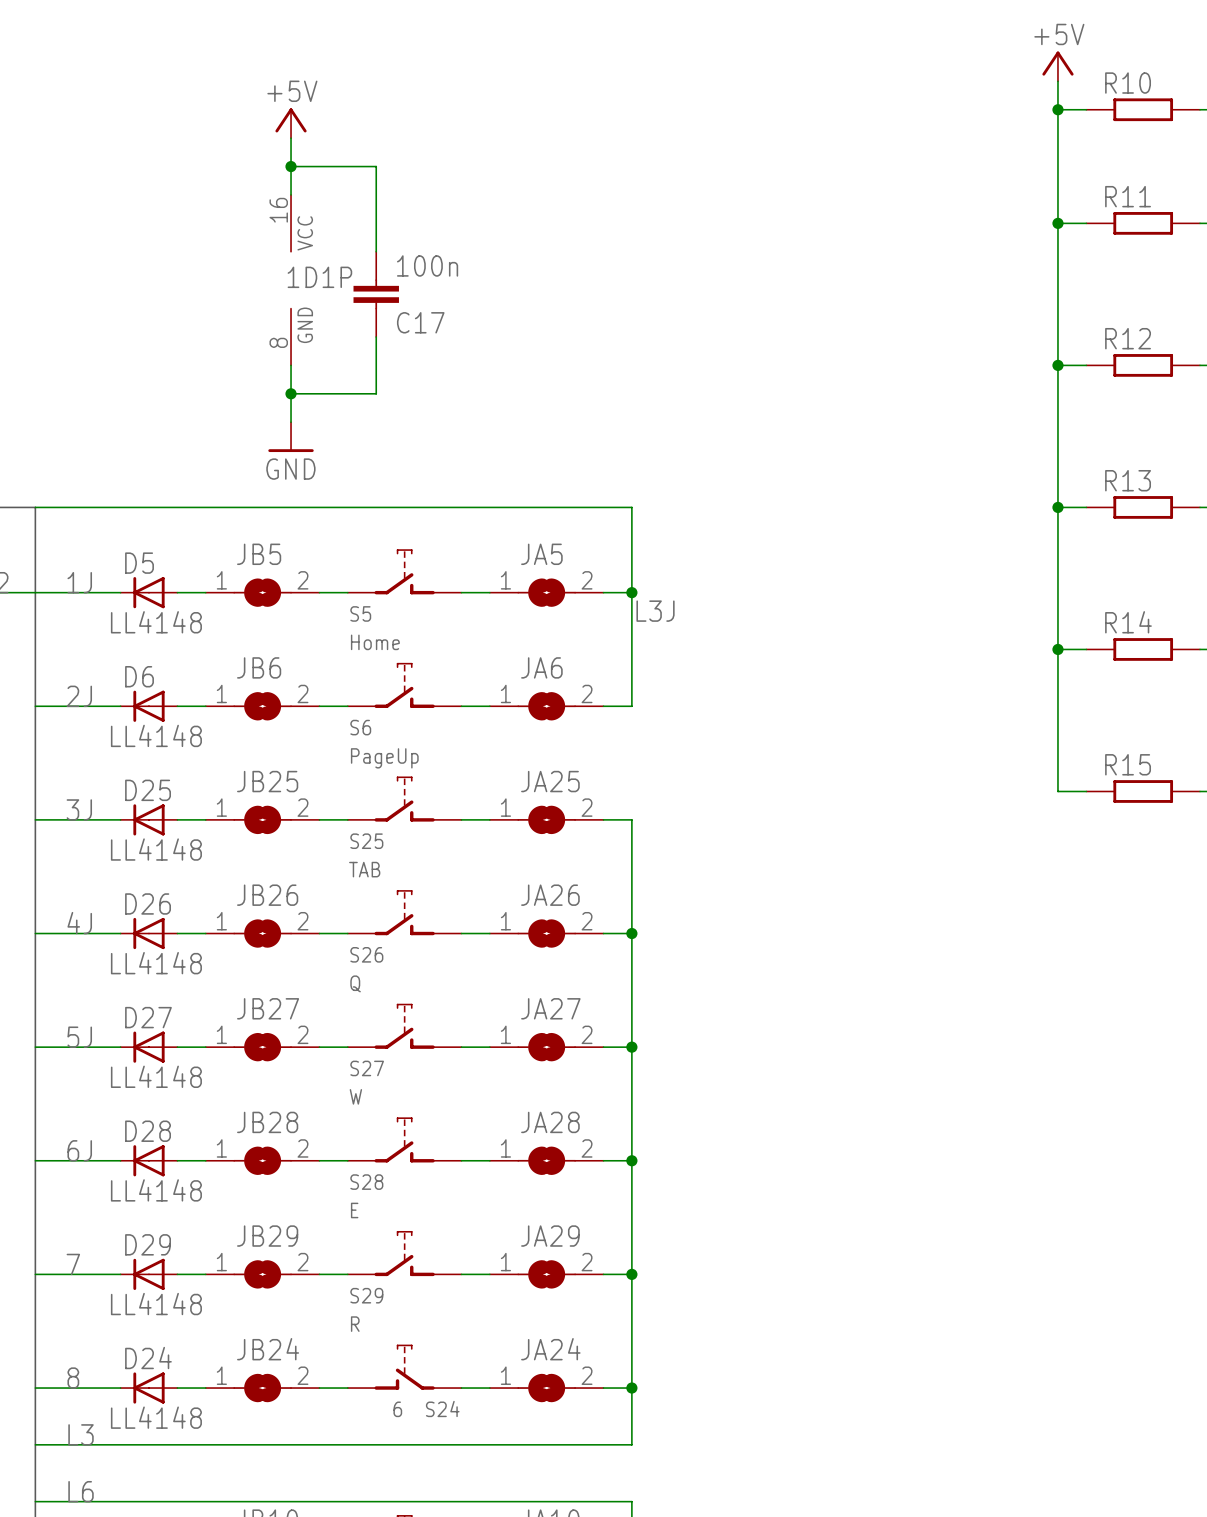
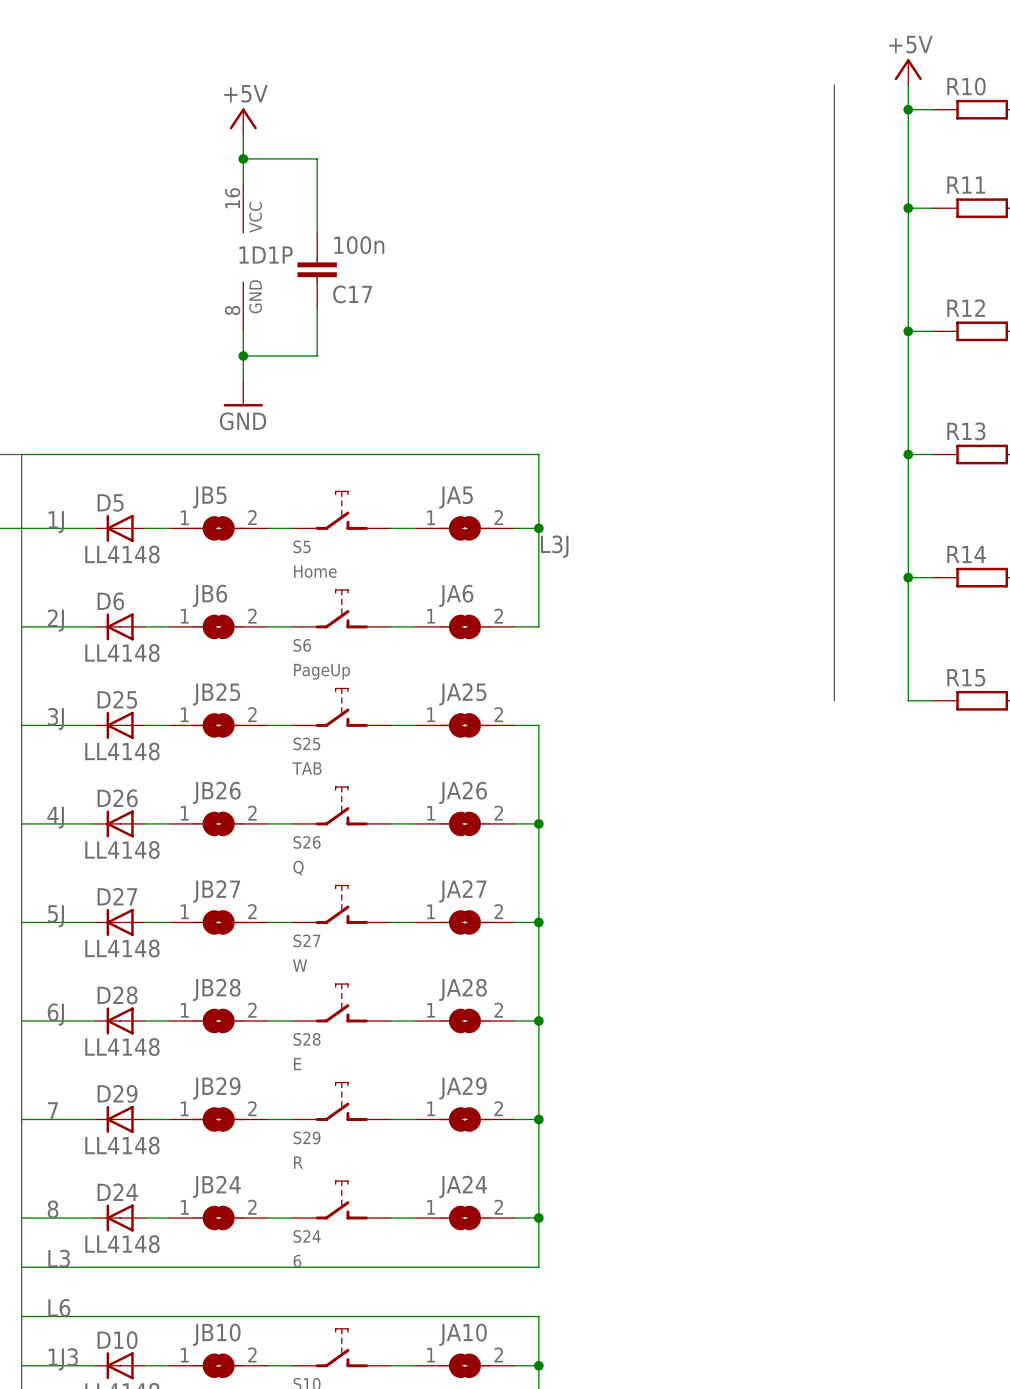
bus: none -> (834, 85) (834, 700)
S24 flip: as is (404, 1367) -> left-right (341, 1199)
S24 value position: 6 (397, 1409) -> 6 (297, 1261)

